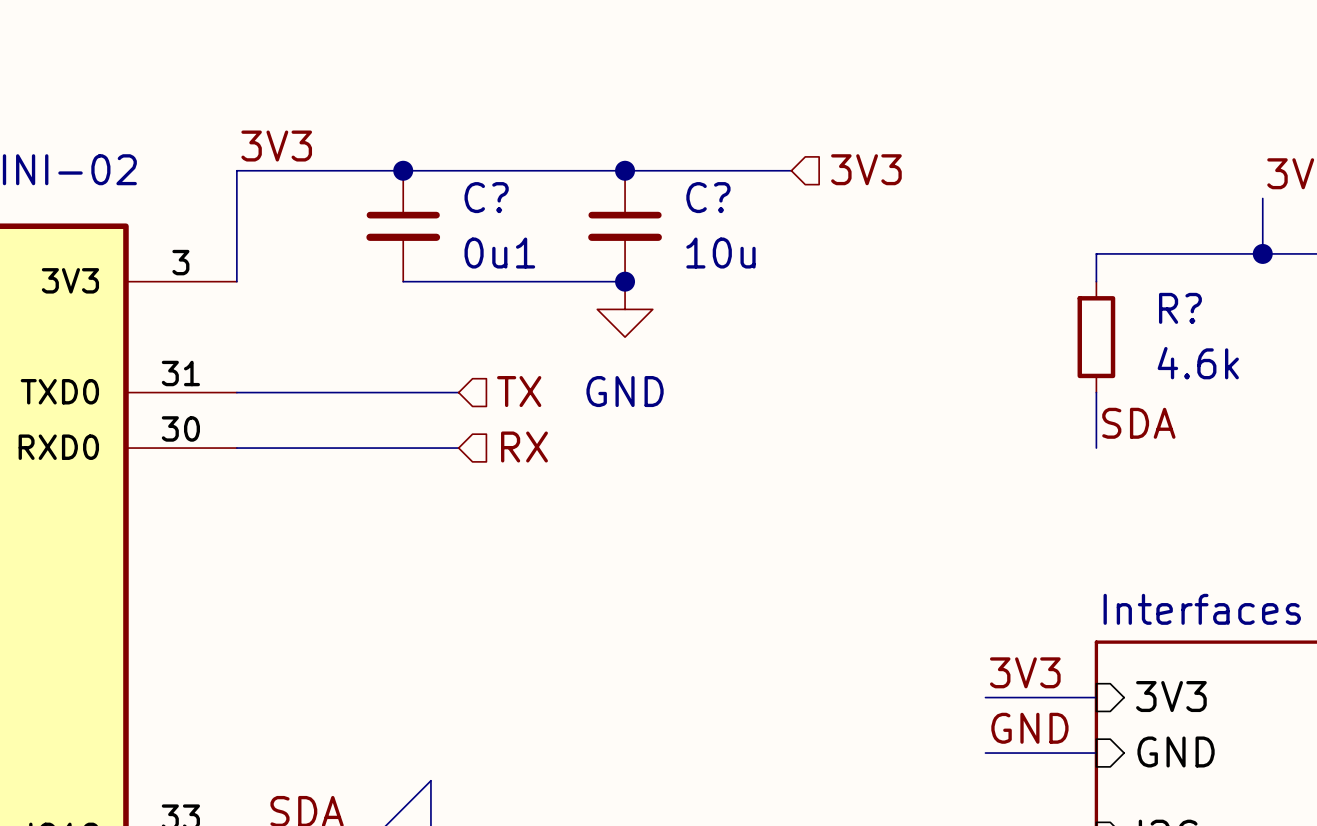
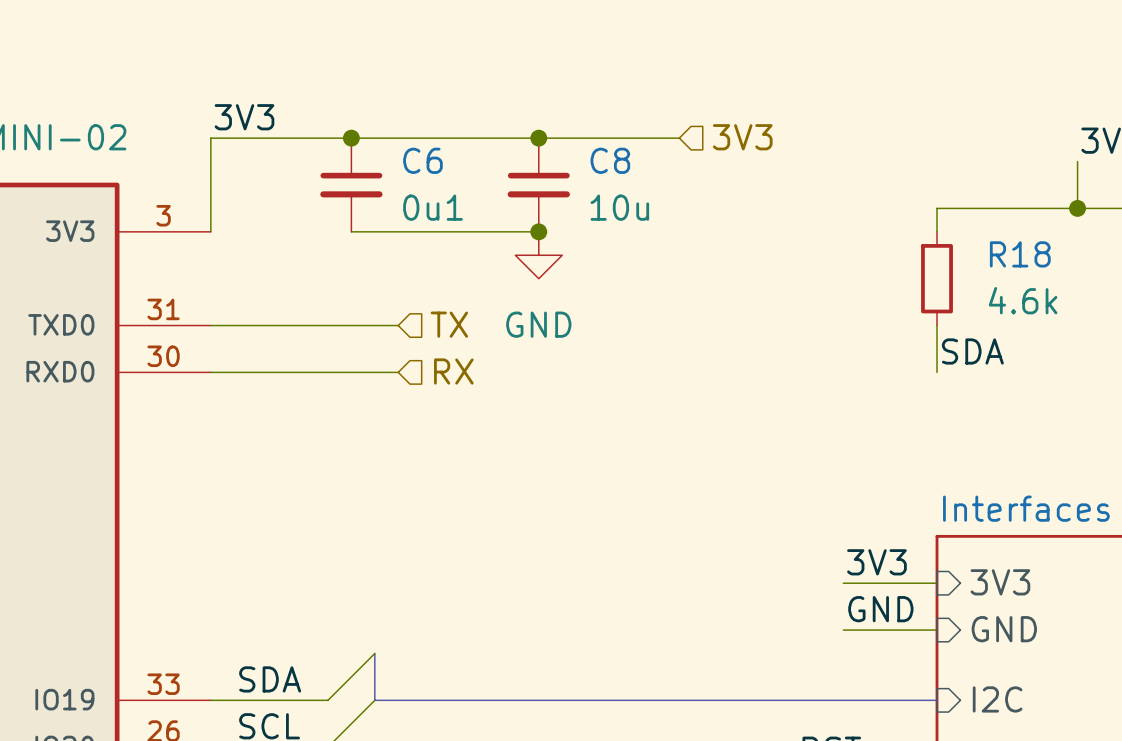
C? name: C? (486, 197) -> C6 (422, 160)
C? name: C? (708, 197) -> C8 (610, 160)
R? name: R? (1180, 308) -> R18 (1020, 254)

